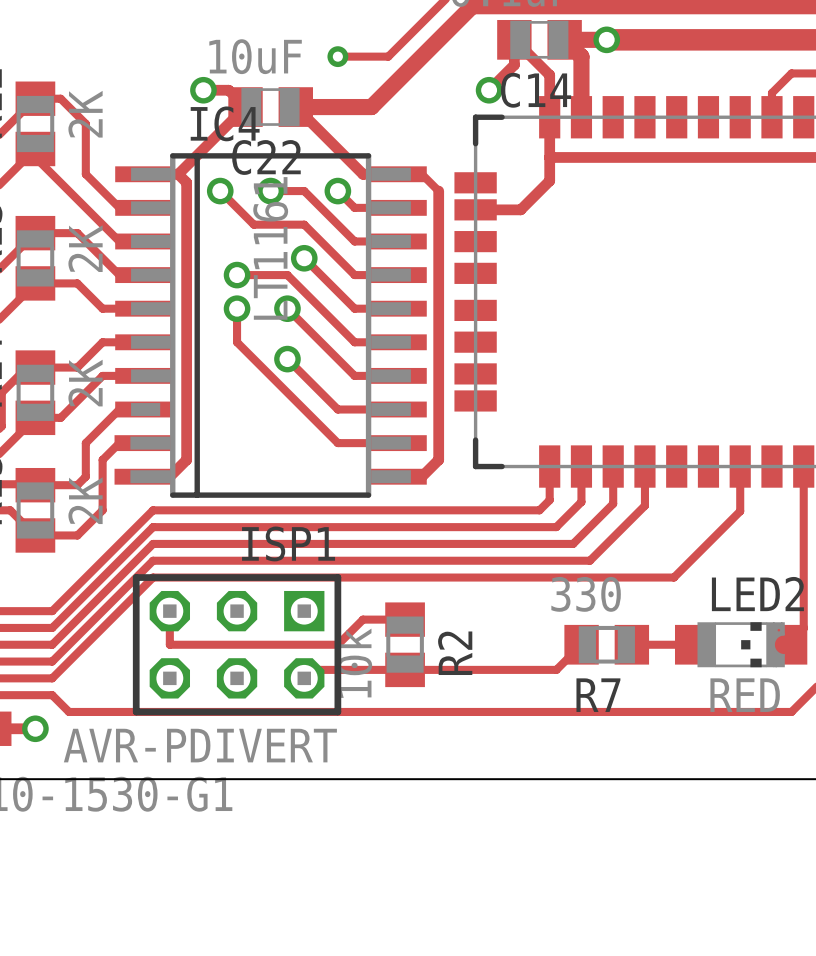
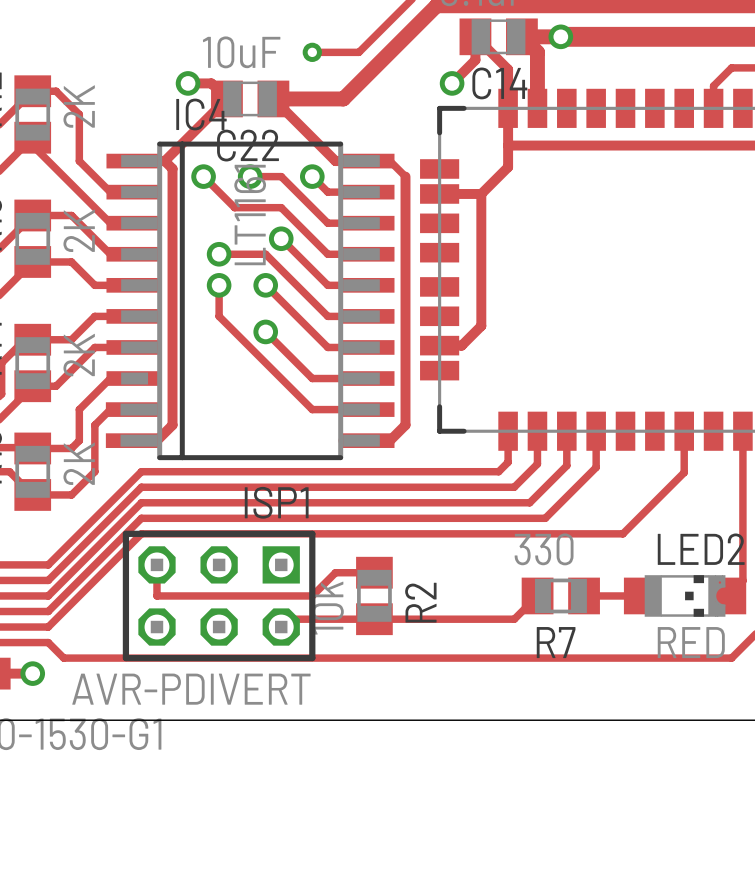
track: none -> (481, 193) (481, 325) (461, 345) (439, 345)

